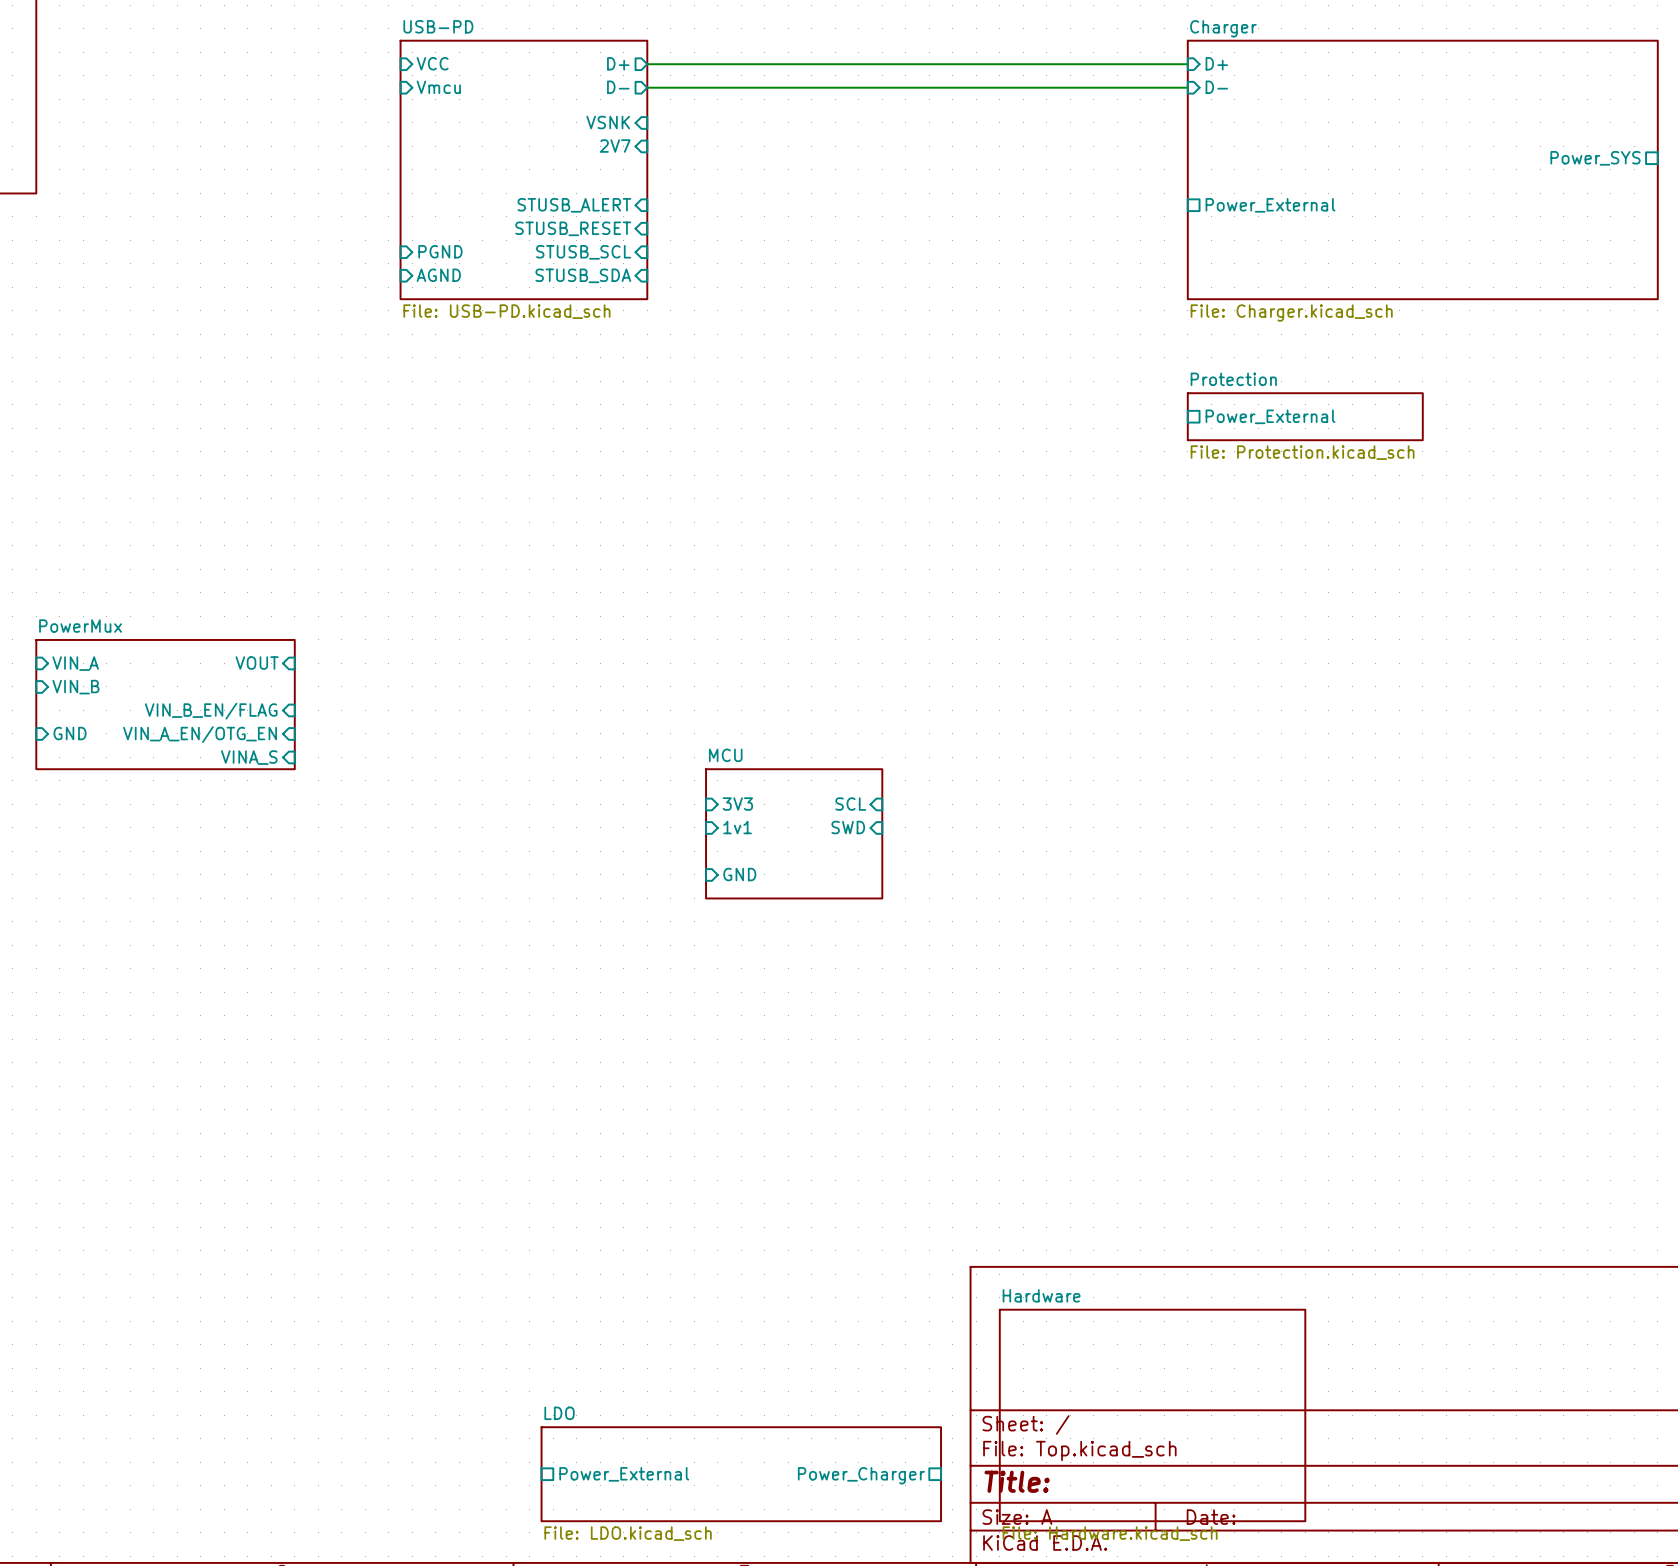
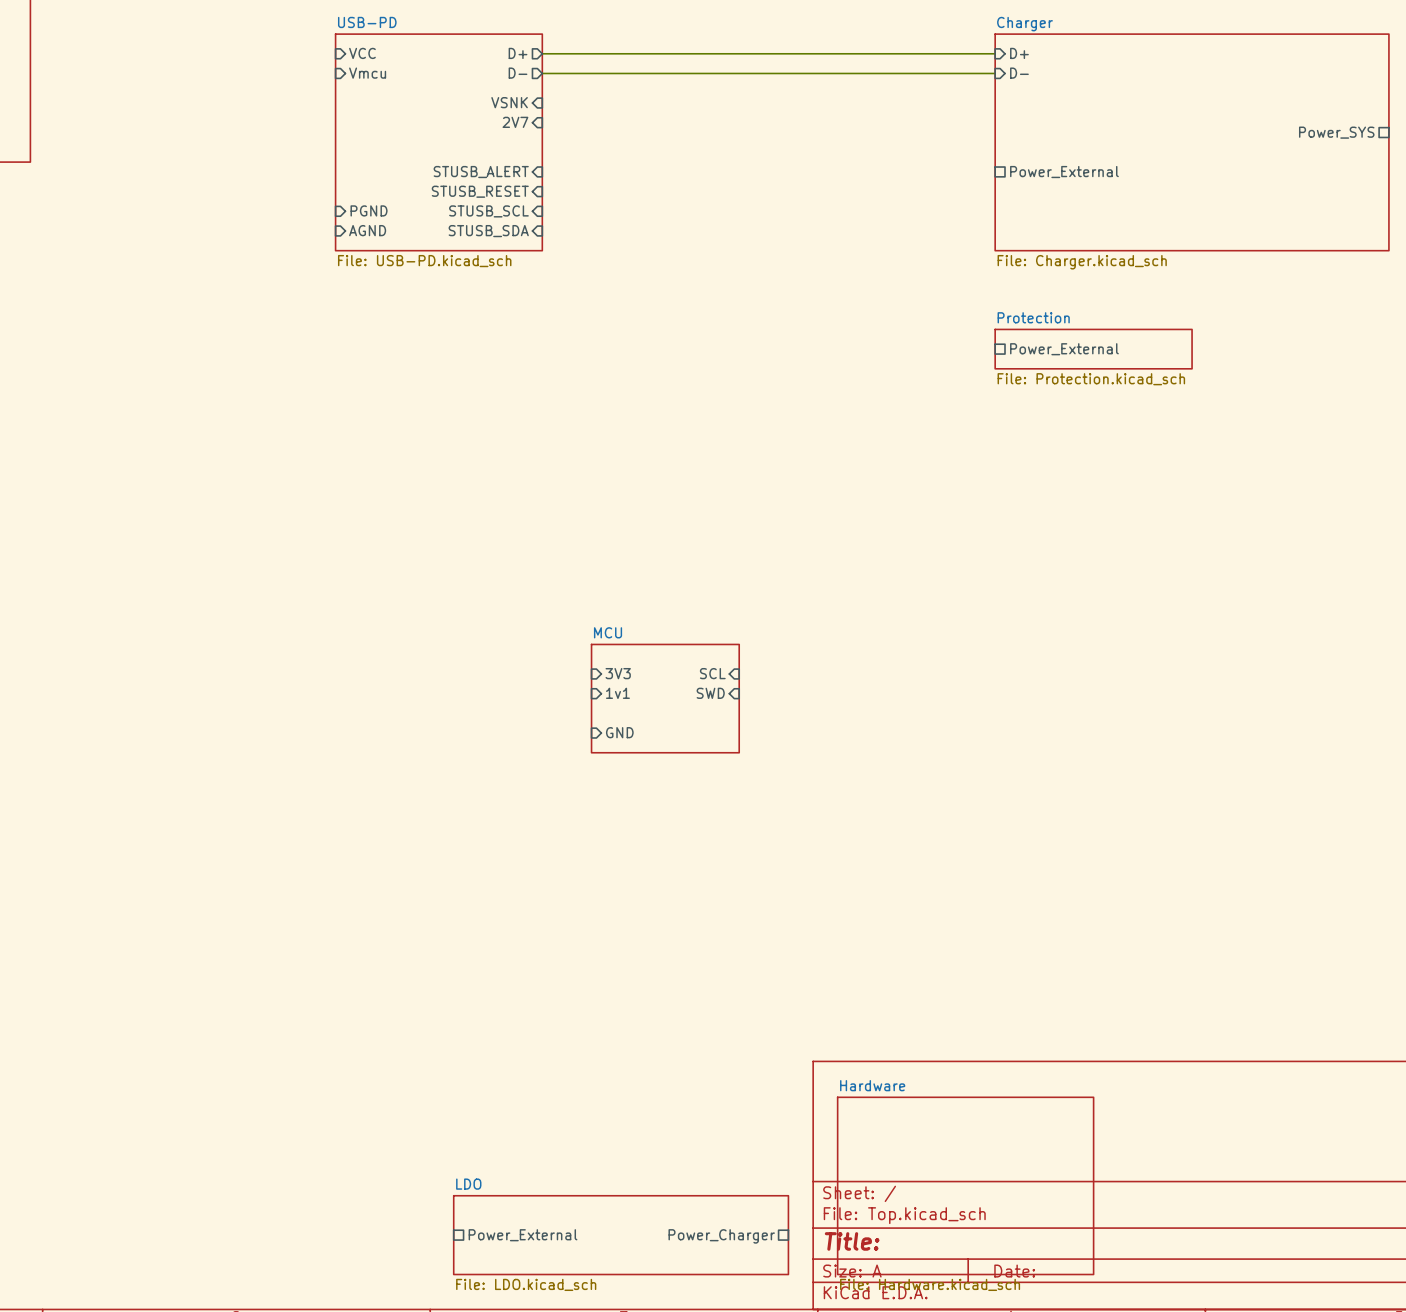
sheet pin: VIN_A (75, 663) -> none
sheet pin: VOUT (257, 663) -> none
sheet pin: VIN_B (75, 687) -> none
sheet PowerMux: (165, 704) -> none
sheet pin: VIN_B_EN/FLAG (211, 711) -> none
sheet pin: GND (70, 733) -> none
sheet pin: VIN_A_EN/OTG_EN (200, 734) -> none
sheet pin: VINA_S (249, 757) -> none

